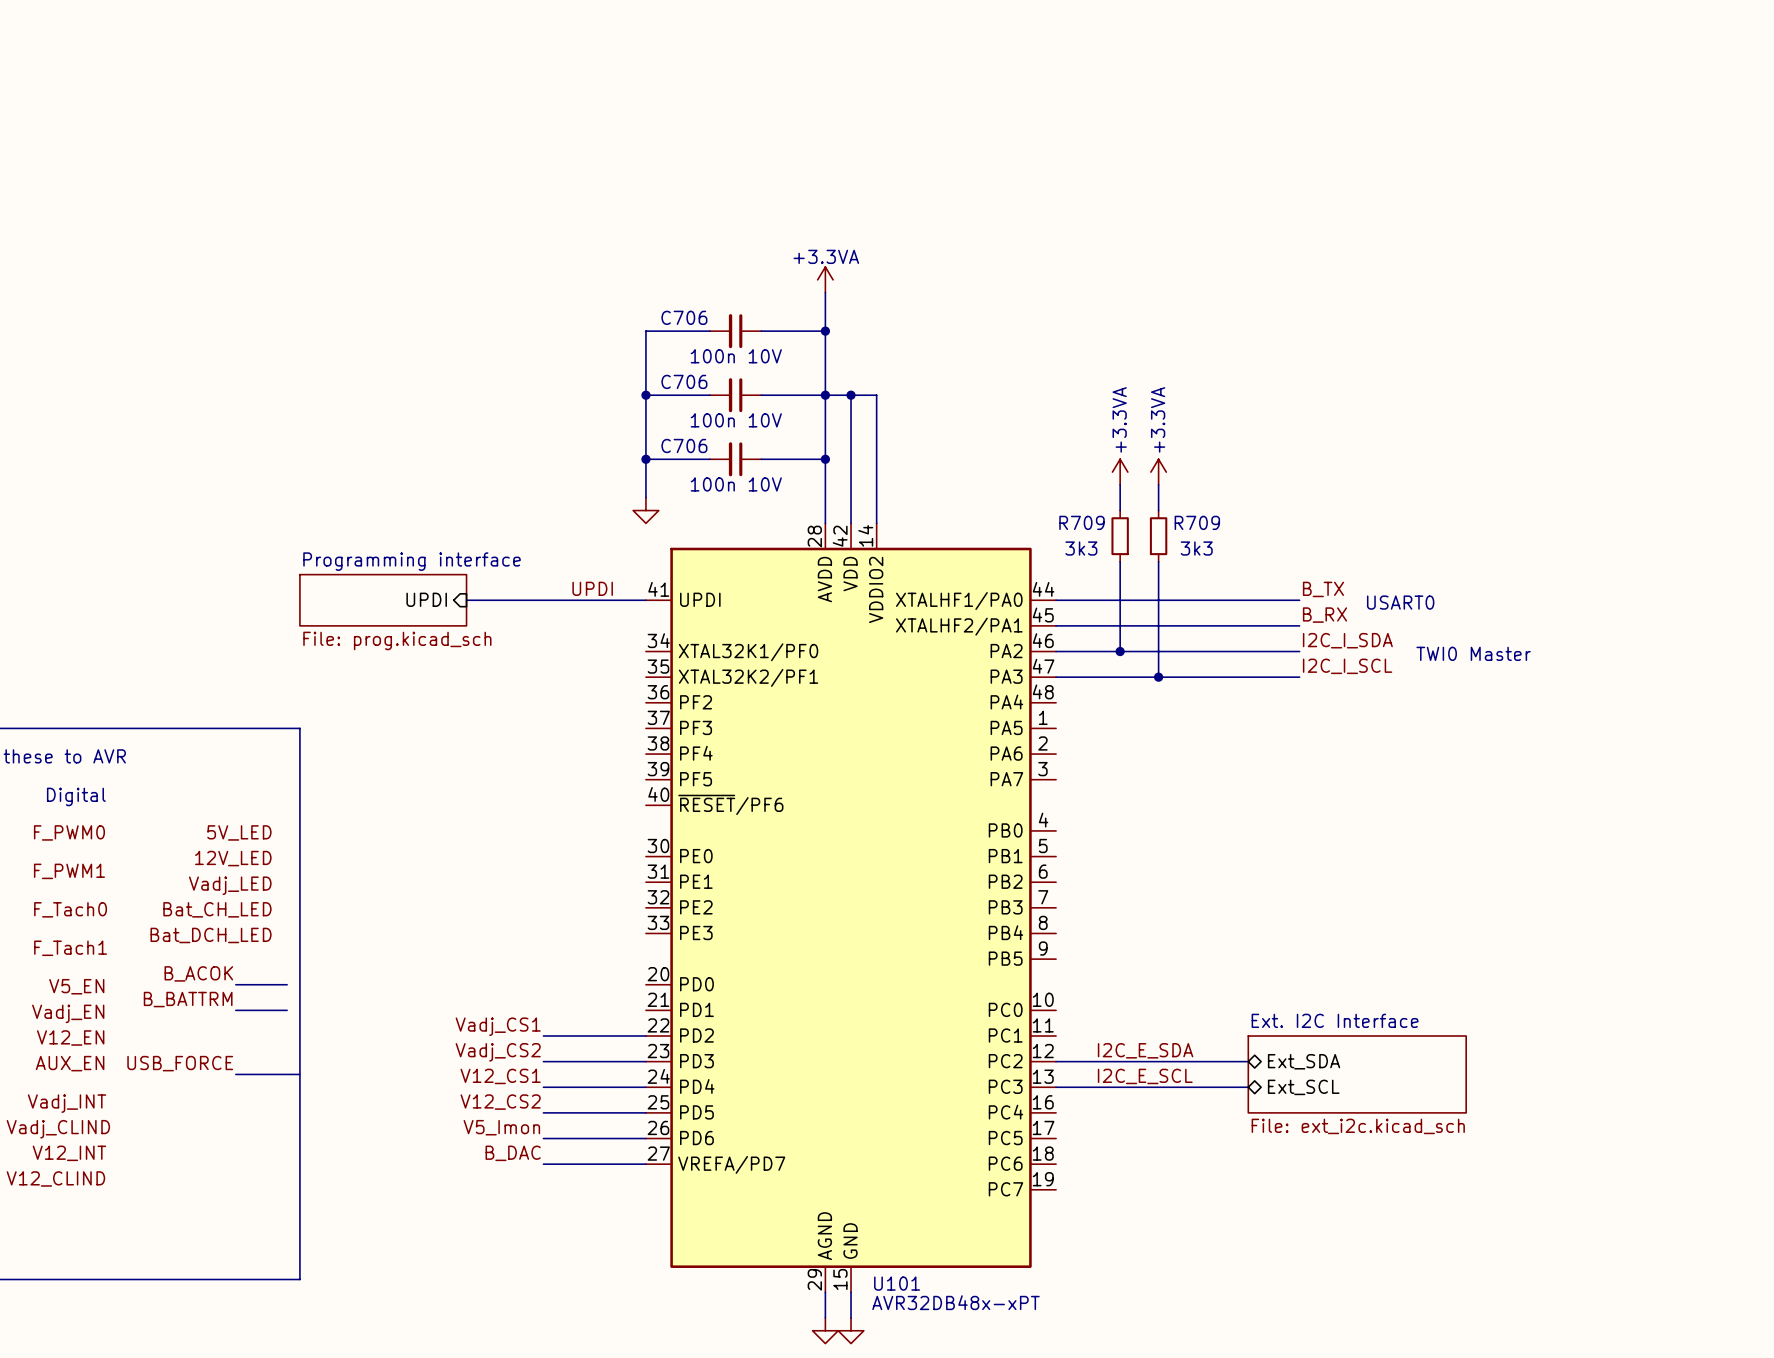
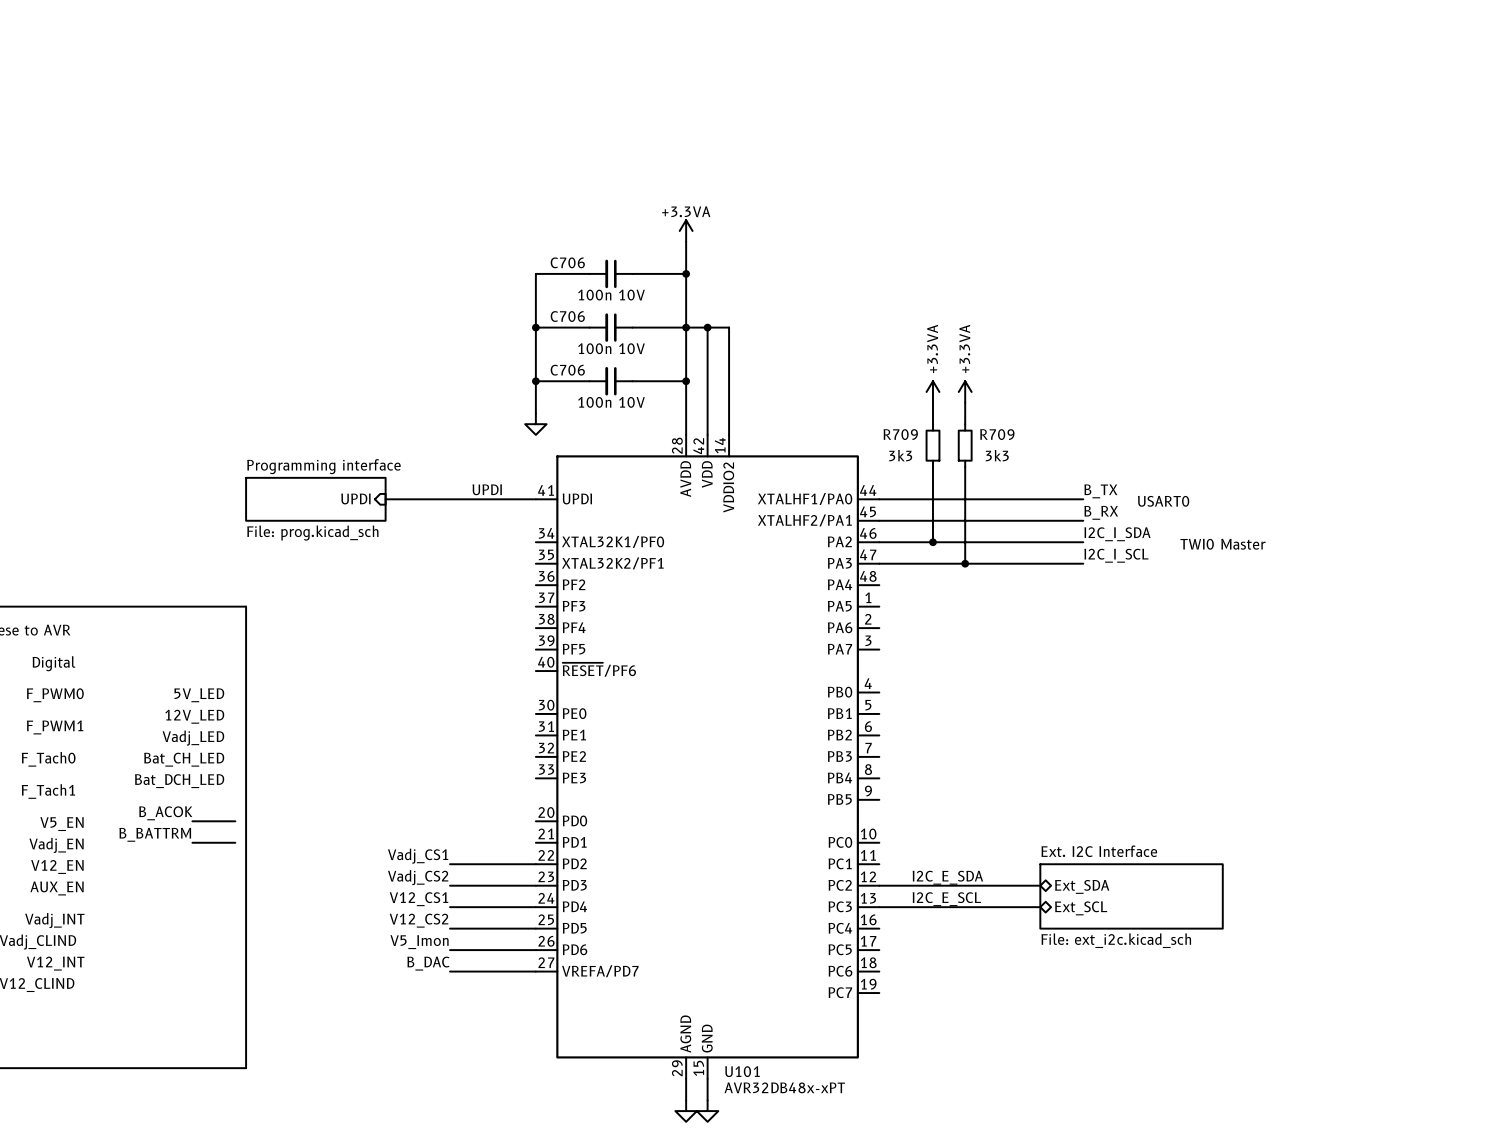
label: USB_FORCE (180, 1063) -> none
wire: (235, 1074) (299, 1074) -> none

